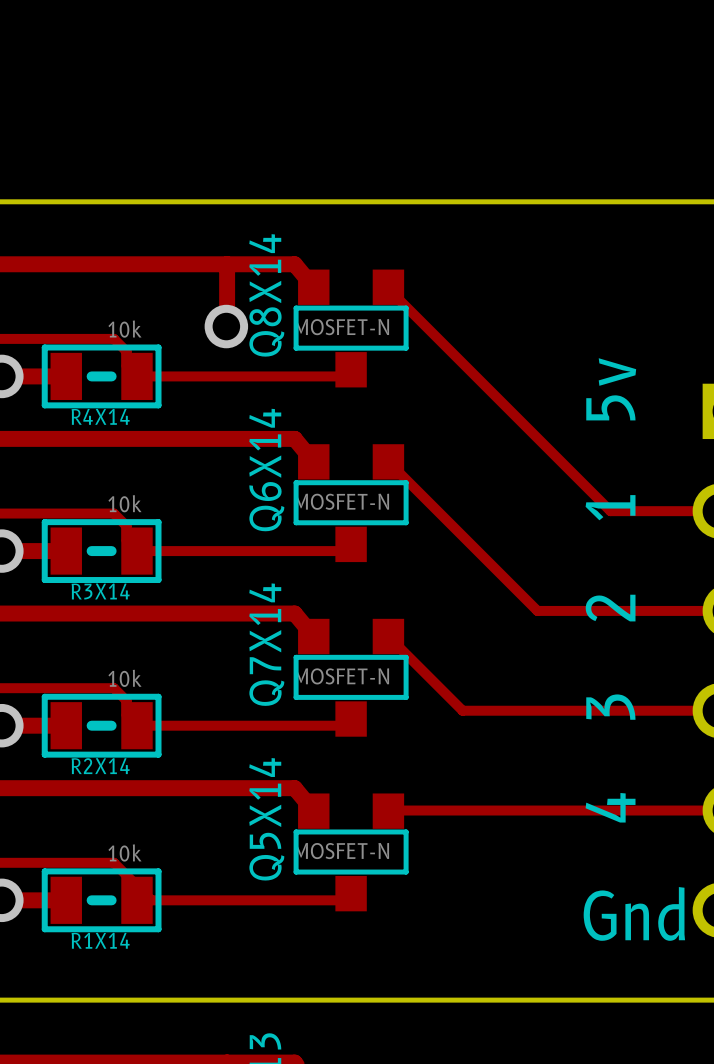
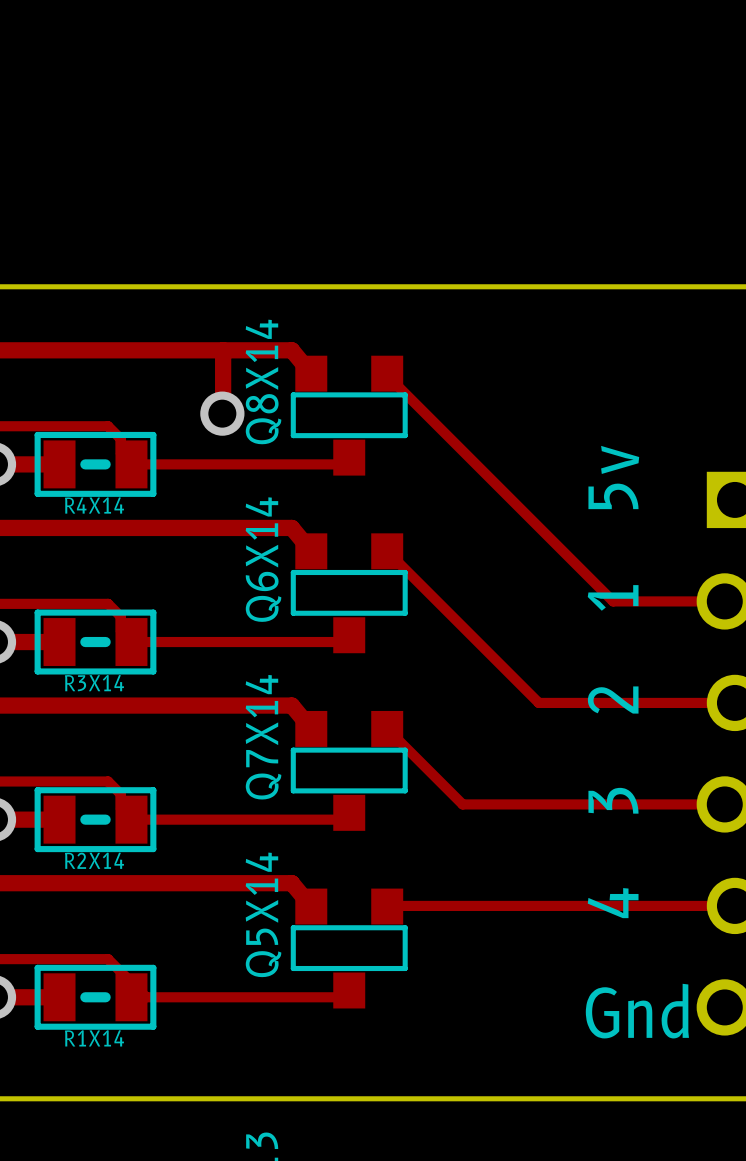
Q8X14 value: MOSFET-N (341, 327) -> none
R4X14 value: 10k (124, 329) -> none
Q6X14 value: MOSFET-N (341, 501) -> none
R3X14 value: 10k (124, 503) -> none
Q7X14 value: MOSFET-N (341, 676) -> none
R2X14 value: 10k (124, 678) -> none
Q5X14 value: MOSFET-N (341, 851) -> none
R1X14 value: 10k (124, 852) -> none

